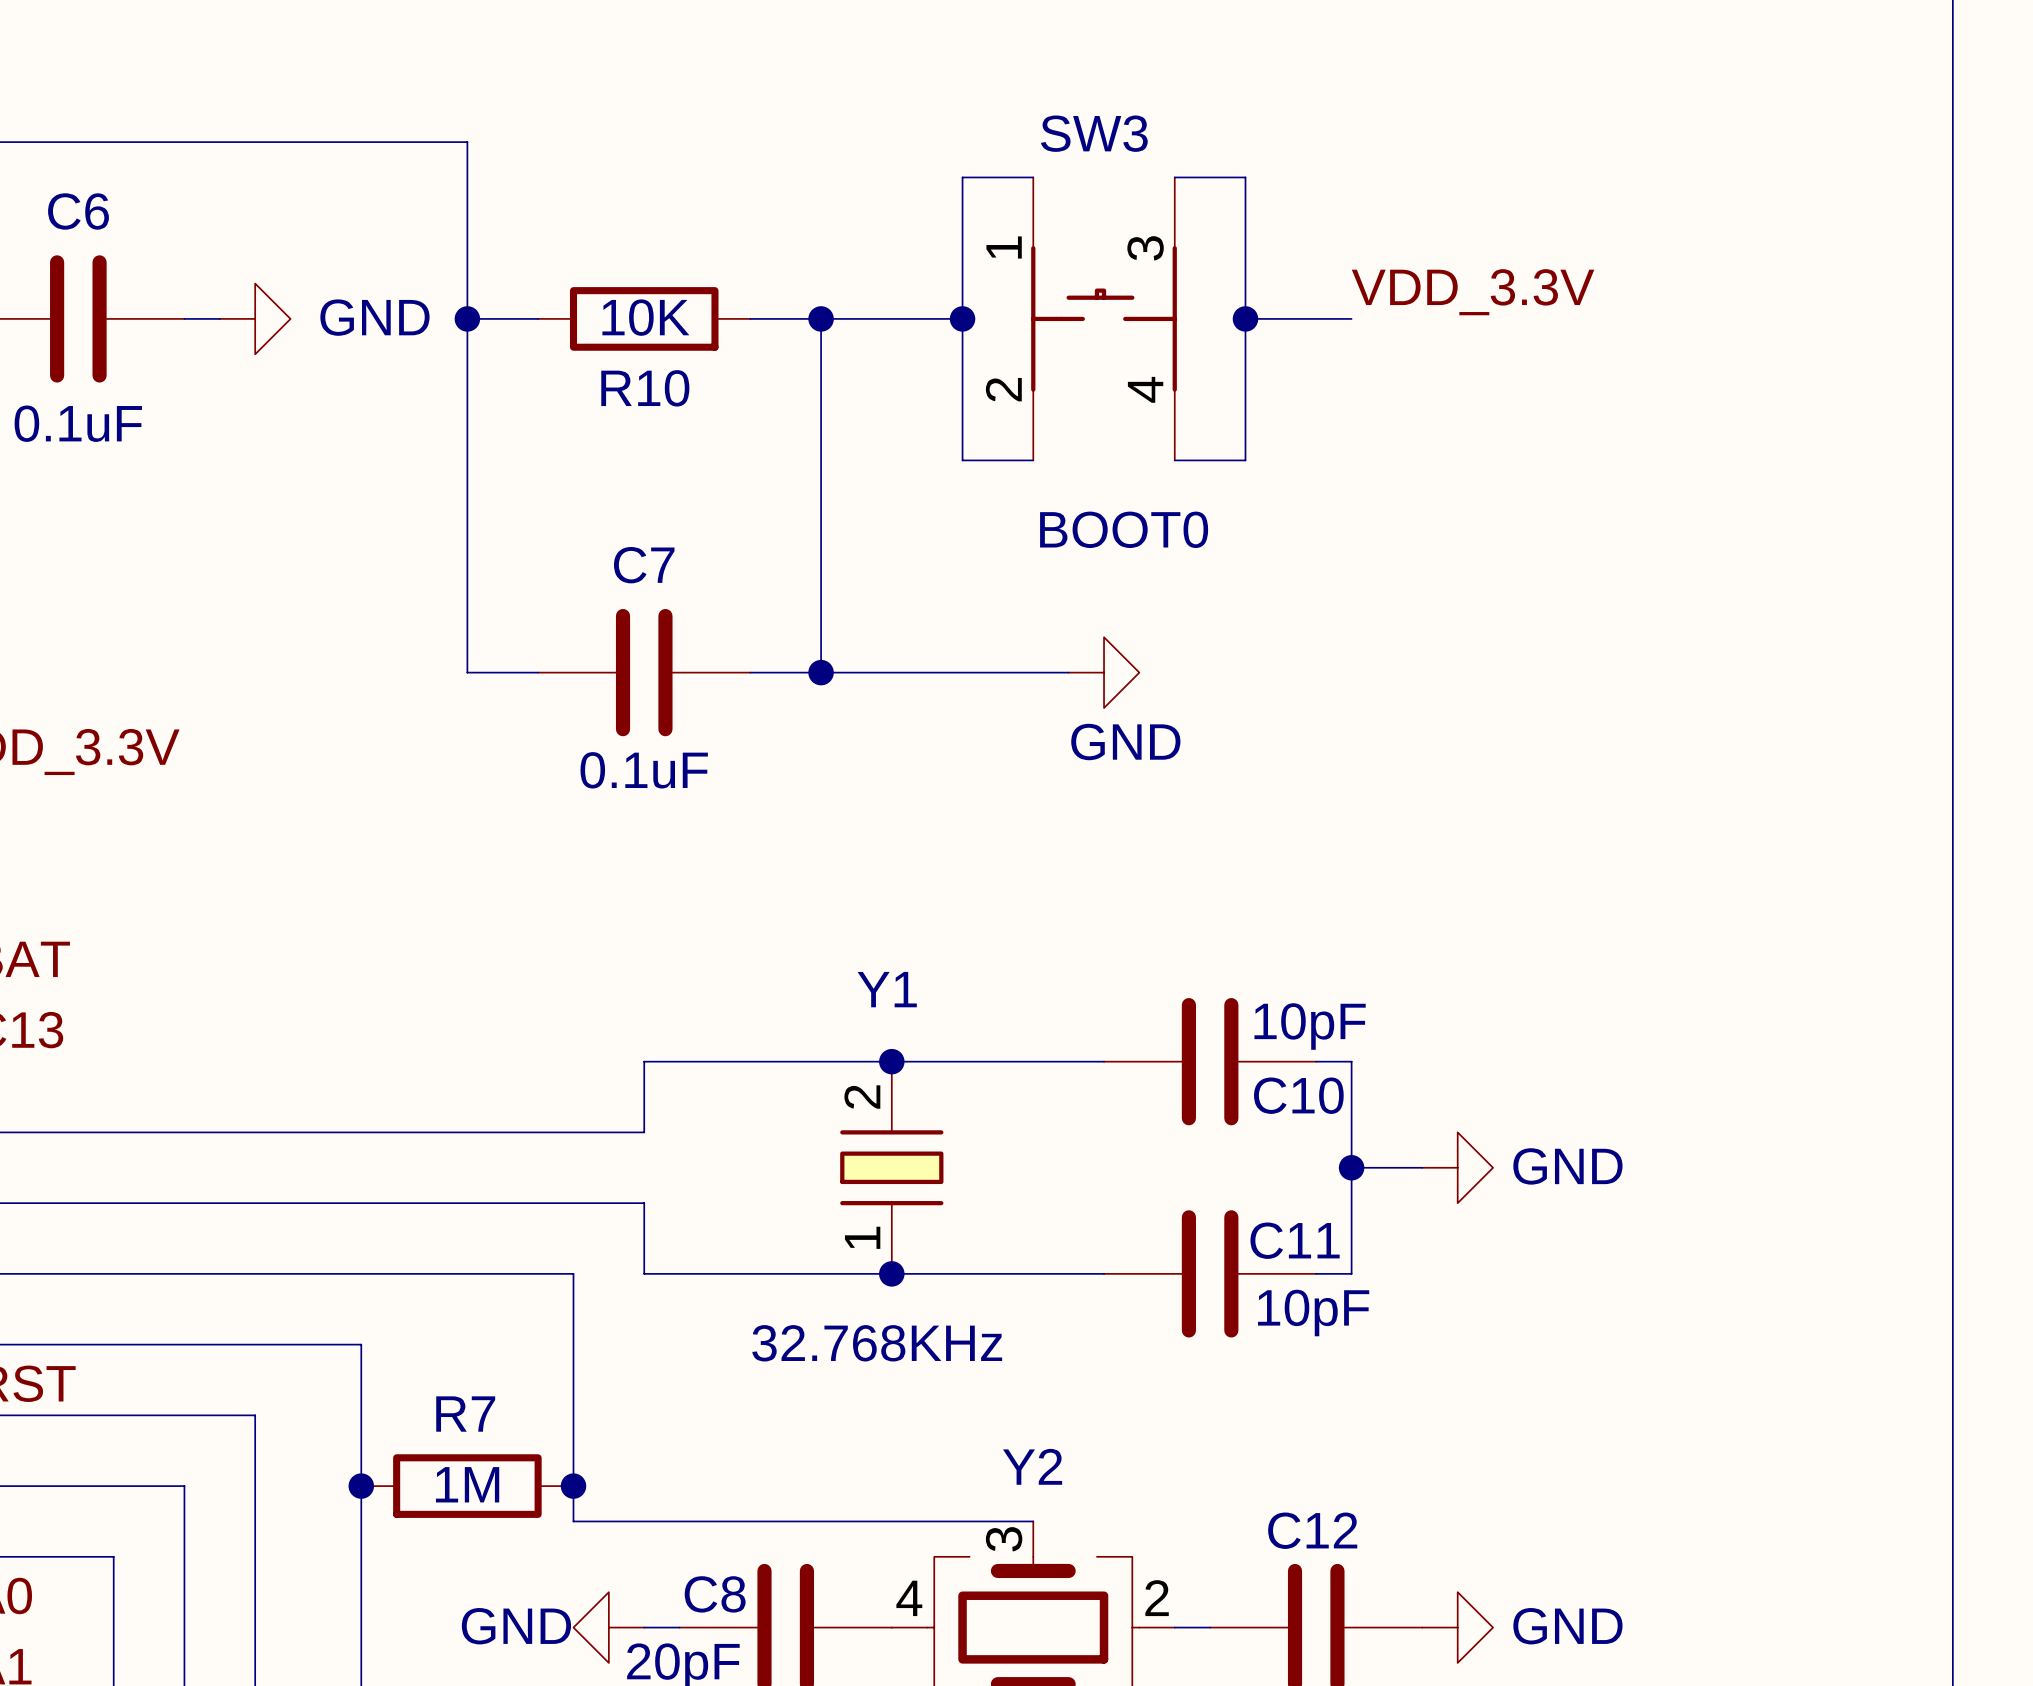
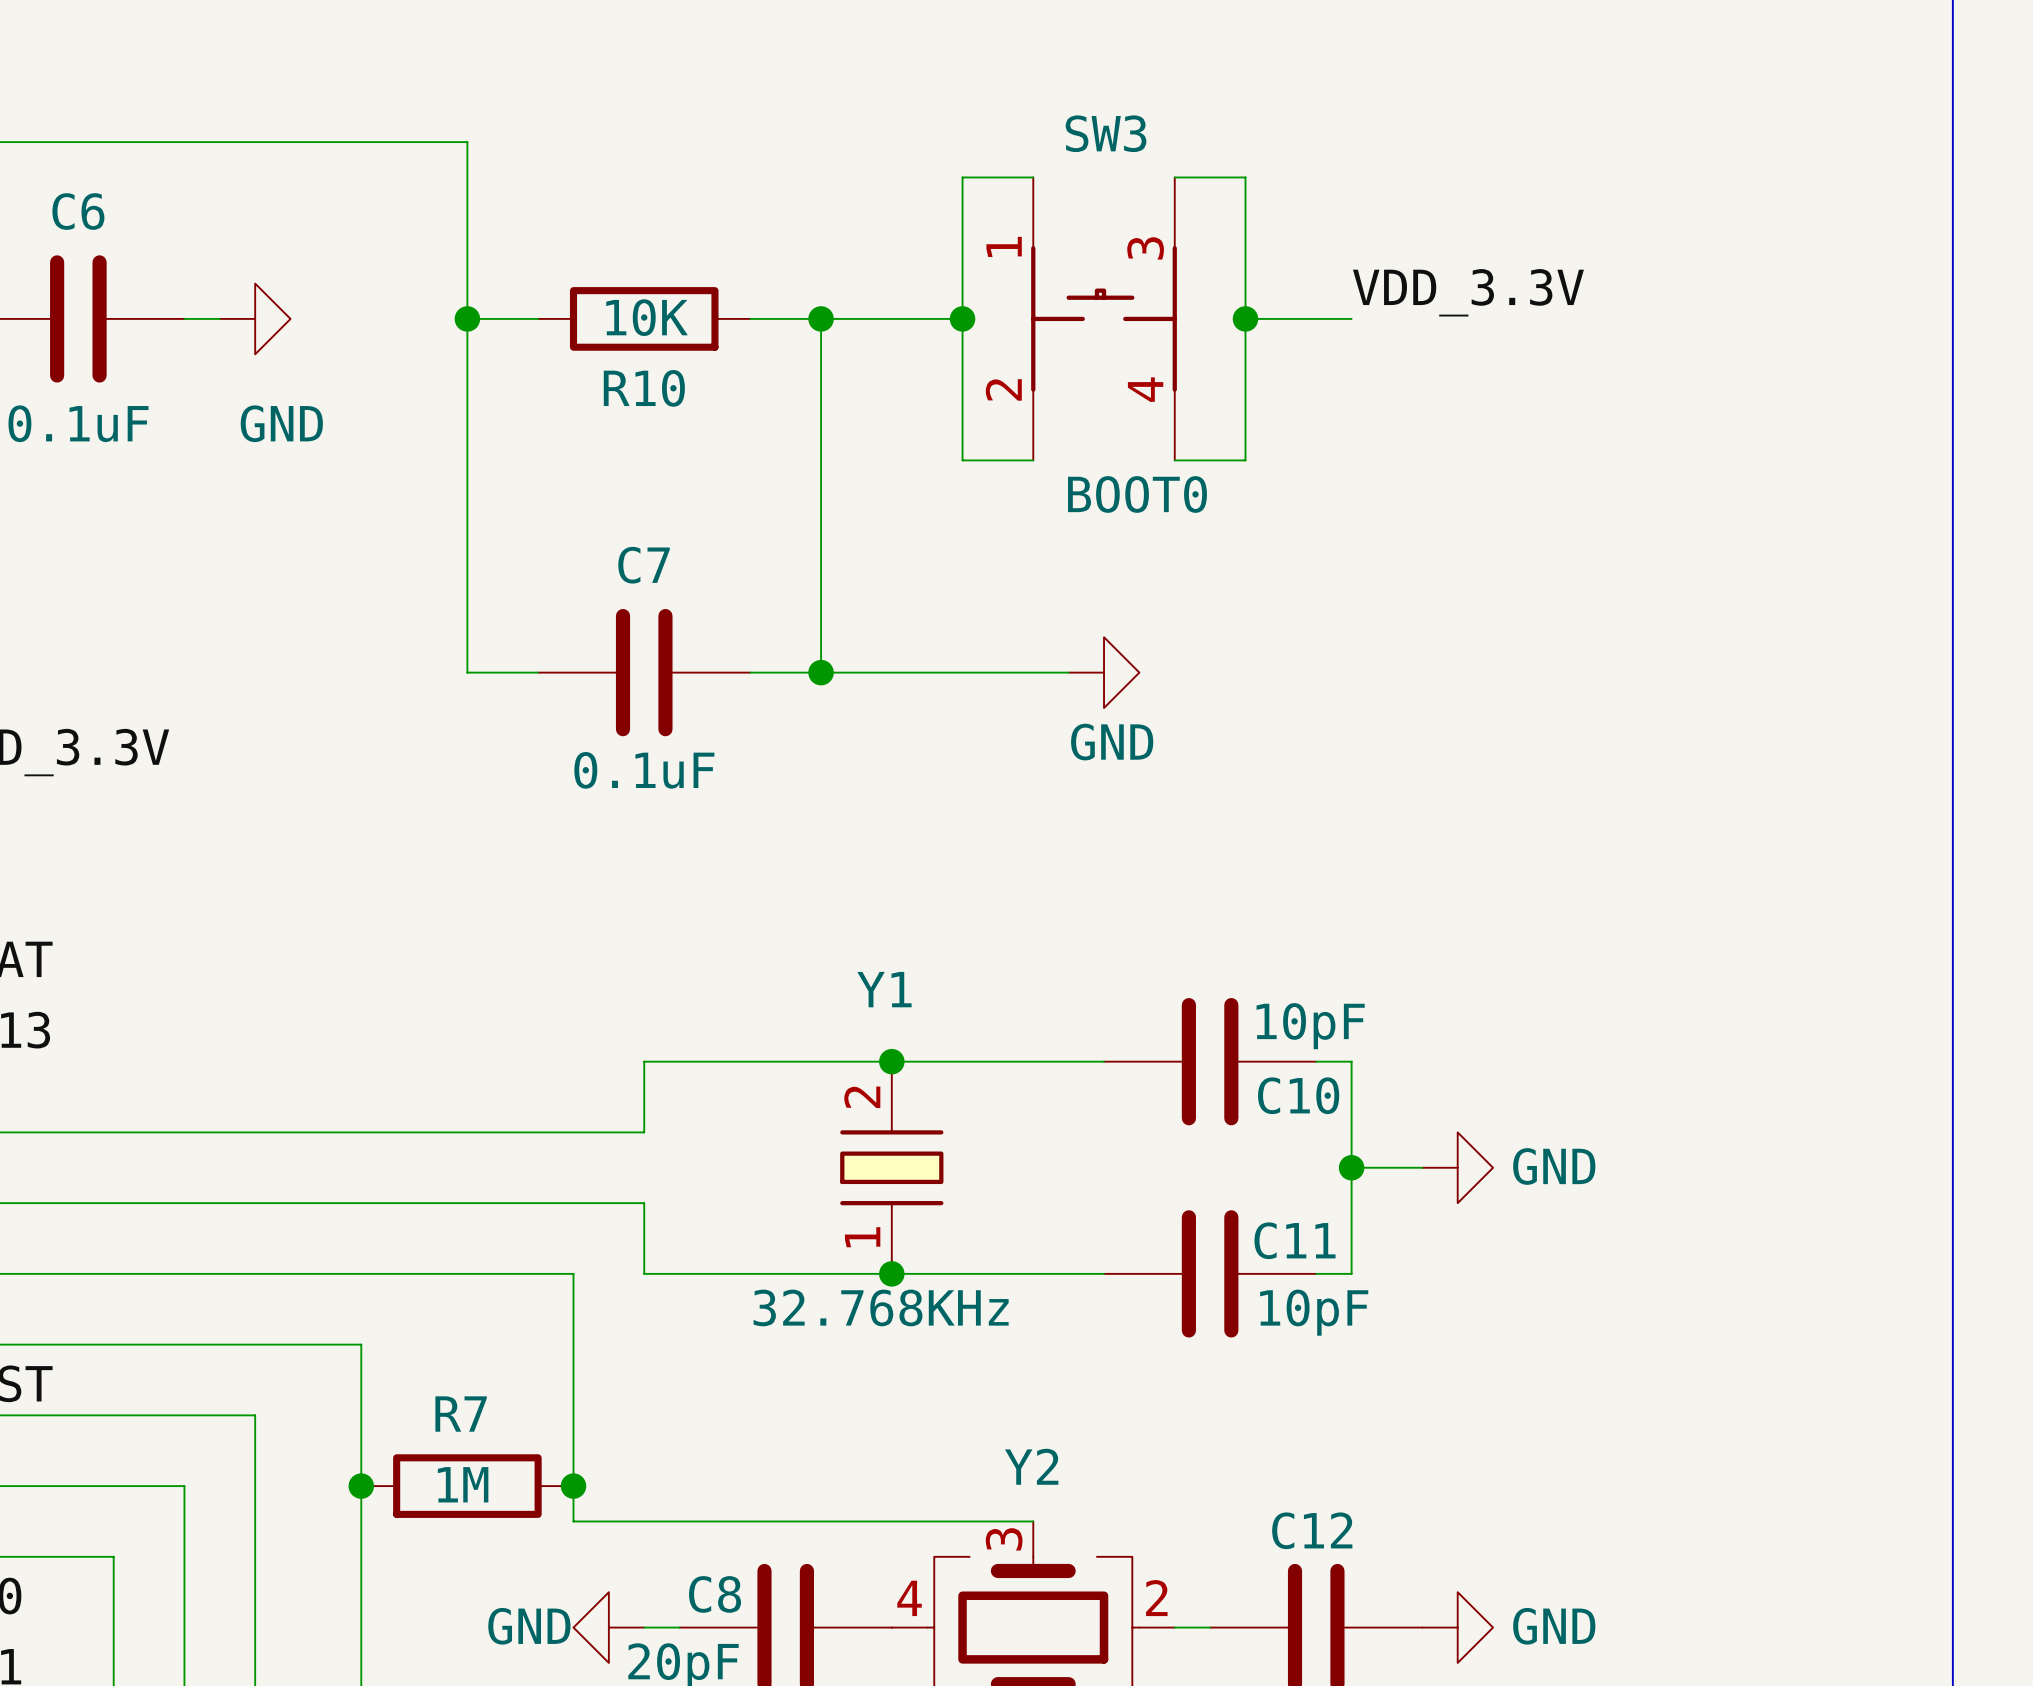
power symbol text position: GND (374, 317) -> GND (281, 423)
SW3 value position: BOOT0 (1124, 529) -> BOOT0 (1137, 494)
Y1 value position: 32.768KHz (877, 1343) -> 32.768KHz (881, 1307)

